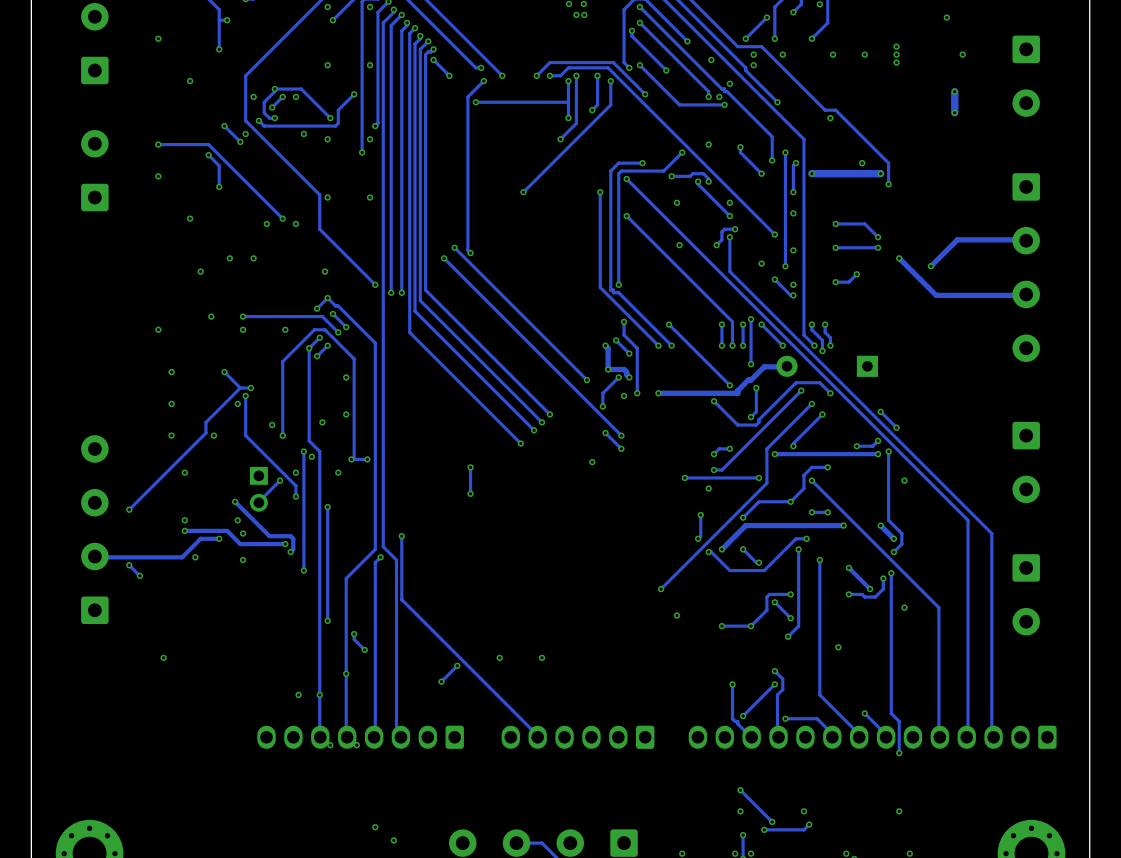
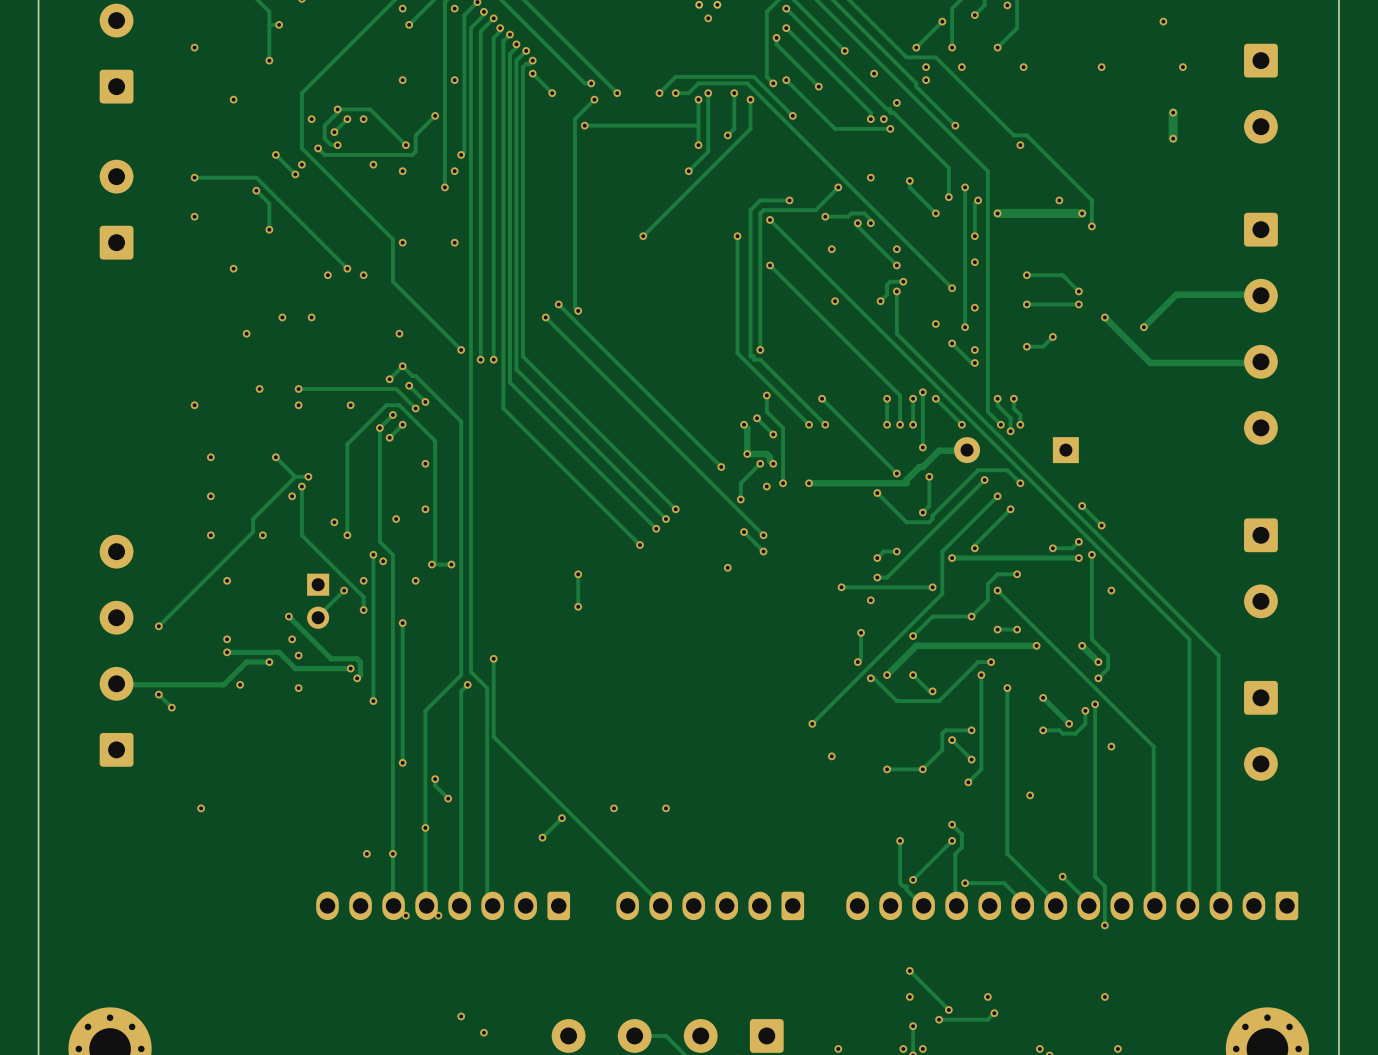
via: (584, 14) -> none
via: (896, 46) -> none
via: (864, 54) -> none
via: (896, 62) -> none

